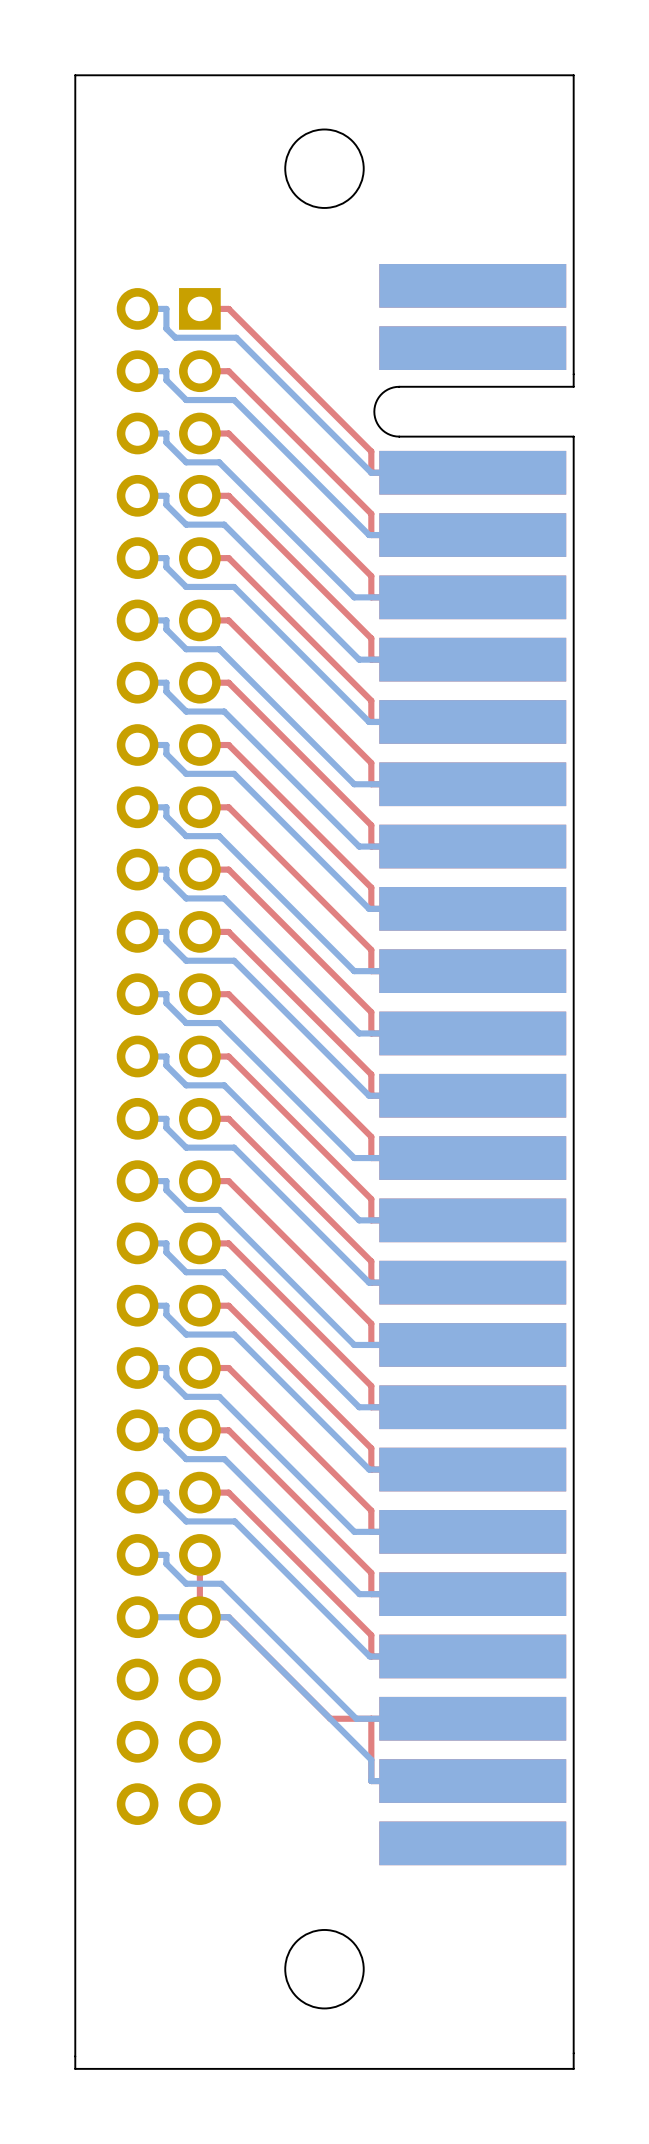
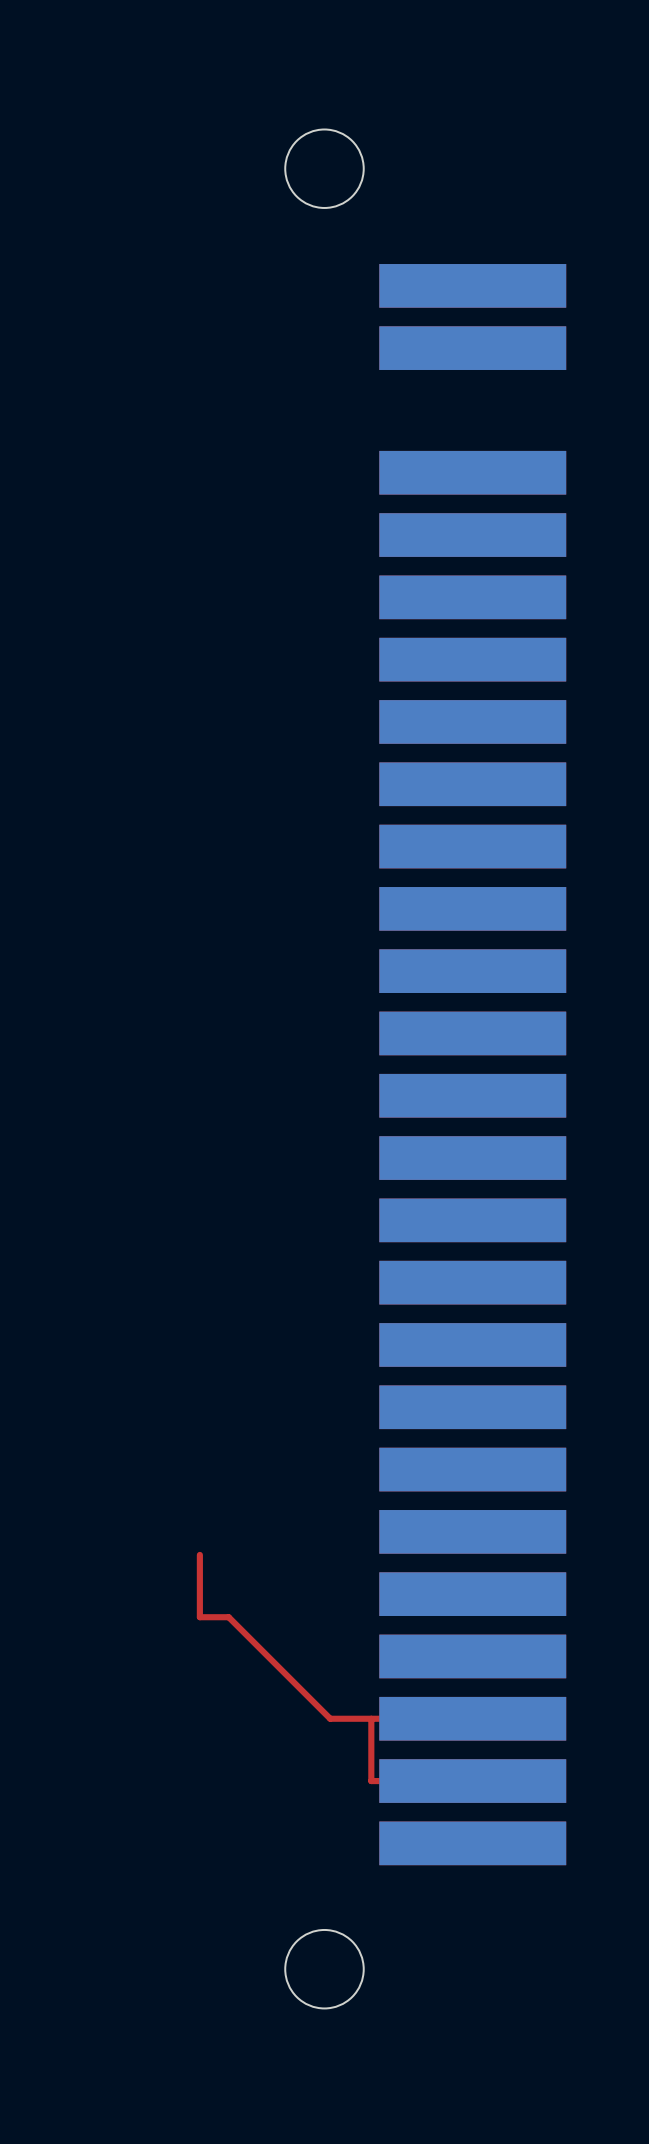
board edge: (573, 75) (573, 386) (396, 386) (387, 389) (380, 395) (375, 402) (374, 411) (375, 420) (380, 428) (387, 433) (396, 436) (573, 436) (573, 2068) (75, 2068) (75, 75) (573, 75) -> none
bottom track: (137, 308) (166, 308) (166, 328) (175, 337) (236, 337) (371, 472) (472, 472) -> none
top track: (199, 308) (228, 308) (371, 451) (371, 472) (472, 472) -> none
bottom track: (137, 371) (166, 371) (166, 380) (186, 400) (234, 400) (369, 535) (472, 535) -> none
top track: (199, 371) (228, 371) (371, 513) (371, 535) (472, 535) -> none
bottom track: (137, 433) (166, 433) (166, 442) (186, 462) (219, 462) (354, 597) (472, 597) -> none
top track: (199, 433) (228, 433) (371, 576) (371, 597) (472, 597) -> none
bottom track: (137, 495) (166, 495) (166, 504) (186, 524) (224, 524) (359, 659) (472, 659) -> none
top track: (199, 495) (228, 495) (371, 638) (371, 659) (472, 659) -> none
bottom track: (137, 558) (166, 558) (166, 567) (186, 586) (234, 586) (369, 721) (472, 721) -> none
top track: (199, 558) (228, 558) (371, 700) (371, 721) (472, 721) -> none
bottom track: (137, 620) (166, 620) (166, 629) (186, 649) (219, 649) (354, 784) (472, 784) -> none
top track: (199, 620) (228, 620) (371, 763) (371, 784) (472, 784) -> none
bottom track: (137, 682) (166, 682) (166, 691) (186, 711) (224, 711) (359, 846) (472, 846) -> none
top track: (199, 682) (228, 682) (371, 825) (371, 846) (472, 846) -> none
bottom track: (137, 745) (166, 745) (166, 754) (186, 773) (234, 773) (369, 908) (472, 908) -> none
top track: (199, 745) (228, 745) (371, 887) (371, 908) (472, 908) -> none
bottom track: (137, 807) (166, 807) (166, 816) (186, 836) (219, 836) (354, 971) (472, 971) -> none
top track: (199, 807) (228, 807) (371, 949) (371, 971) (472, 971) -> none
bottom track: (137, 869) (166, 869) (166, 878) (186, 898) (224, 898) (359, 1033) (472, 1033) -> none
top track: (199, 869) (228, 869) (371, 1012) (371, 1033) (472, 1033) -> none
bottom track: (137, 931) (166, 931) (166, 940) (186, 960) (234, 960) (369, 1095) (472, 1095) -> none
top track: (199, 931) (228, 931) (371, 1074) (371, 1095) (472, 1095) -> none
bottom track: (137, 994) (166, 994) (166, 1003) (186, 1023) (219, 1023) (354, 1158) (472, 1158) -> none
top track: (199, 994) (228, 994) (371, 1136) (371, 1158) (472, 1158) -> none
bottom track: (137, 1056) (166, 1056) (166, 1065) (186, 1085) (224, 1085) (359, 1220) (472, 1220) -> none
part: (168, 1056) -> none
top track: (199, 1056) (228, 1056) (371, 1199) (371, 1220) (472, 1220) -> none
bottom track: (137, 1118) (166, 1118) (166, 1127) (186, 1147) (234, 1147) (369, 1282) (472, 1282) -> none
top track: (199, 1118) (228, 1118) (371, 1261) (371, 1282) (472, 1282) -> none
bottom track: (137, 1181) (166, 1181) (166, 1190) (186, 1209) (219, 1209) (354, 1344) (472, 1344) -> none
top track: (199, 1181) (228, 1181) (371, 1323) (371, 1344) (472, 1344) -> none
bottom track: (137, 1243) (166, 1243) (166, 1252) (186, 1272) (224, 1272) (359, 1407) (472, 1407) -> none
top track: (199, 1243) (228, 1243) (371, 1386) (371, 1407) (472, 1407) -> none
bottom track: (137, 1305) (166, 1305) (166, 1314) (186, 1334) (234, 1334) (369, 1469) (472, 1469) -> none
top track: (199, 1305) (228, 1305) (371, 1448) (371, 1469) (472, 1469) -> none
bottom track: (137, 1368) (166, 1368) (166, 1377) (186, 1396) (219, 1396) (354, 1531) (472, 1531) -> none
top track: (199, 1368) (228, 1368) (371, 1510) (371, 1531) (472, 1531) -> none
bottom track: (137, 1430) (166, 1430) (166, 1439) (186, 1459) (224, 1459) (359, 1594) (472, 1594) -> none
top track: (199, 1430) (228, 1430) (371, 1572) (371, 1594) (472, 1594) -> none
bottom track: (137, 1492) (166, 1492) (166, 1501) (186, 1521) (234, 1521) (369, 1656) (472, 1656) -> none
top track: (199, 1492) (228, 1492) (371, 1635) (371, 1656) (472, 1656) -> none
bottom track: (137, 1554) (166, 1554) (166, 1563) (186, 1583) (221, 1583) (356, 1718) (472, 1718) -> none
bottom track: (137, 1617) (228, 1617) (371, 1759) (371, 1781) (472, 1781) -> none

